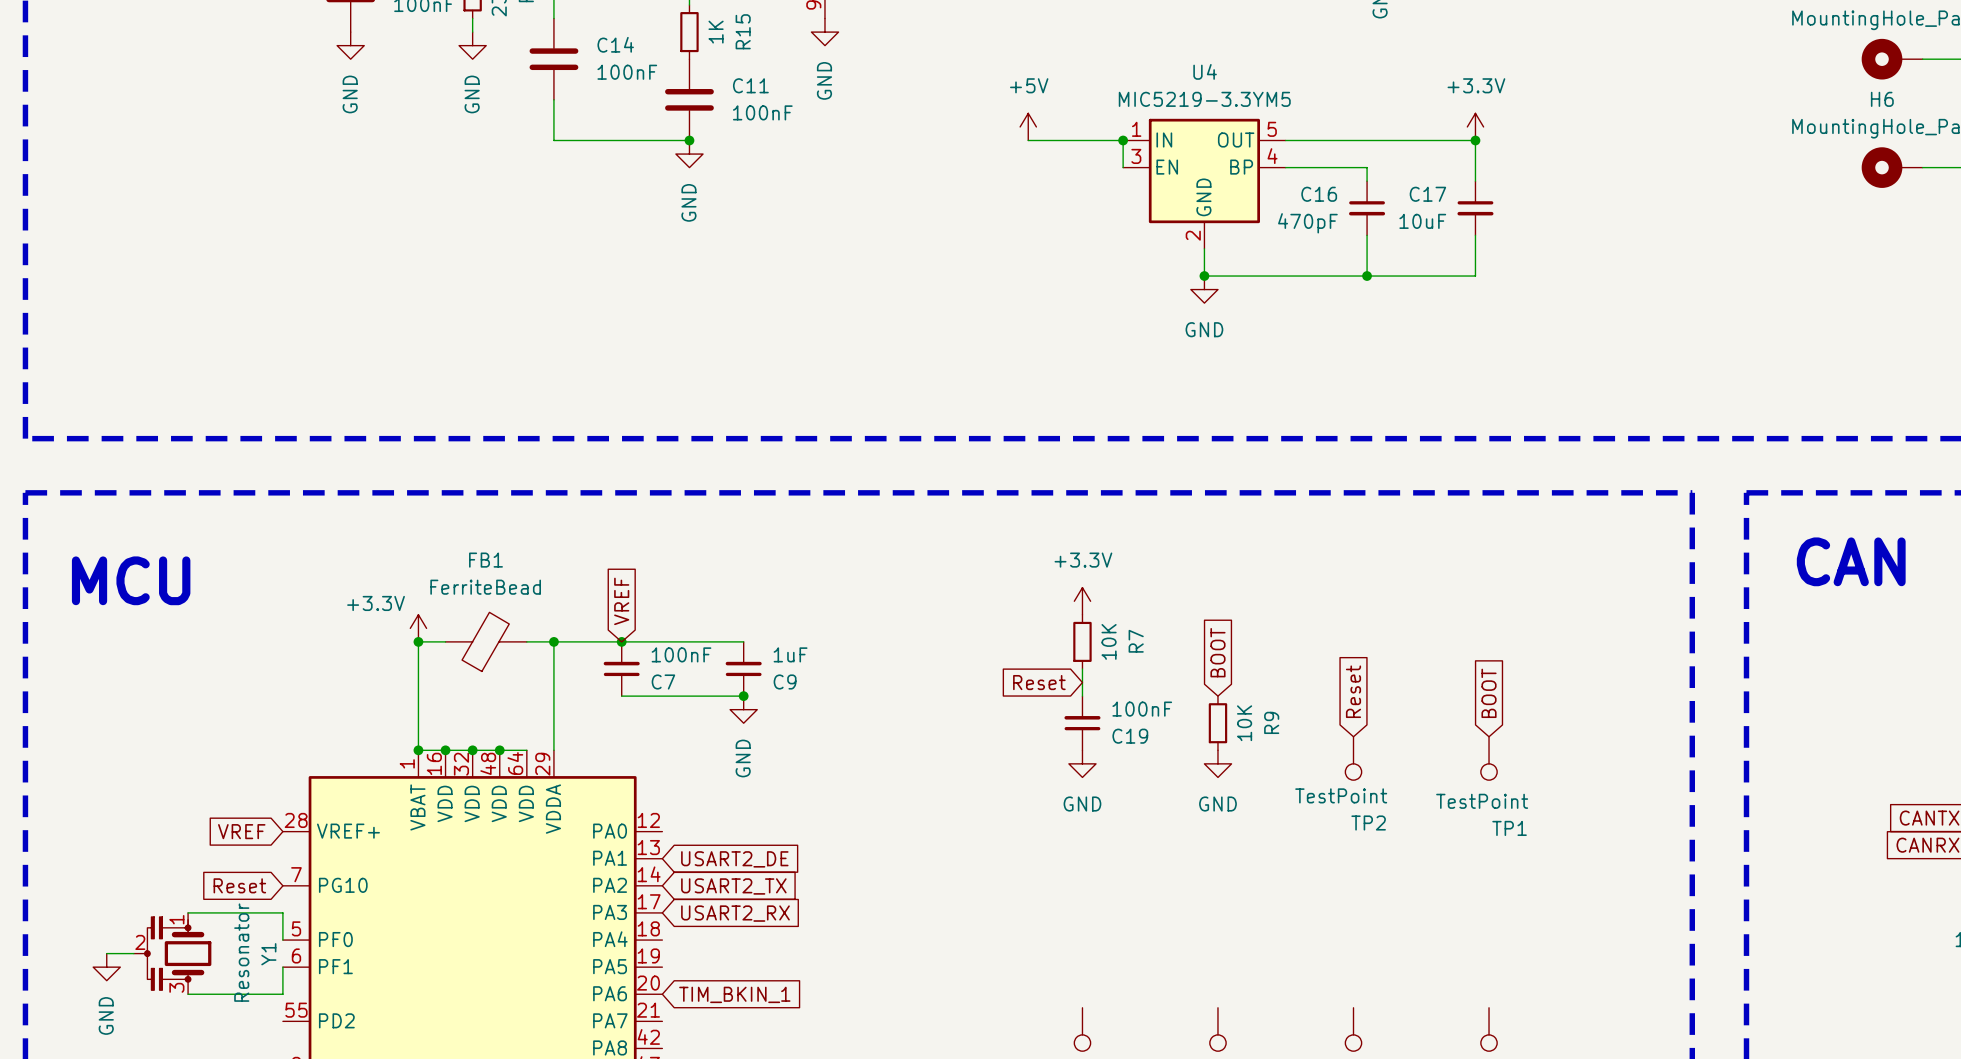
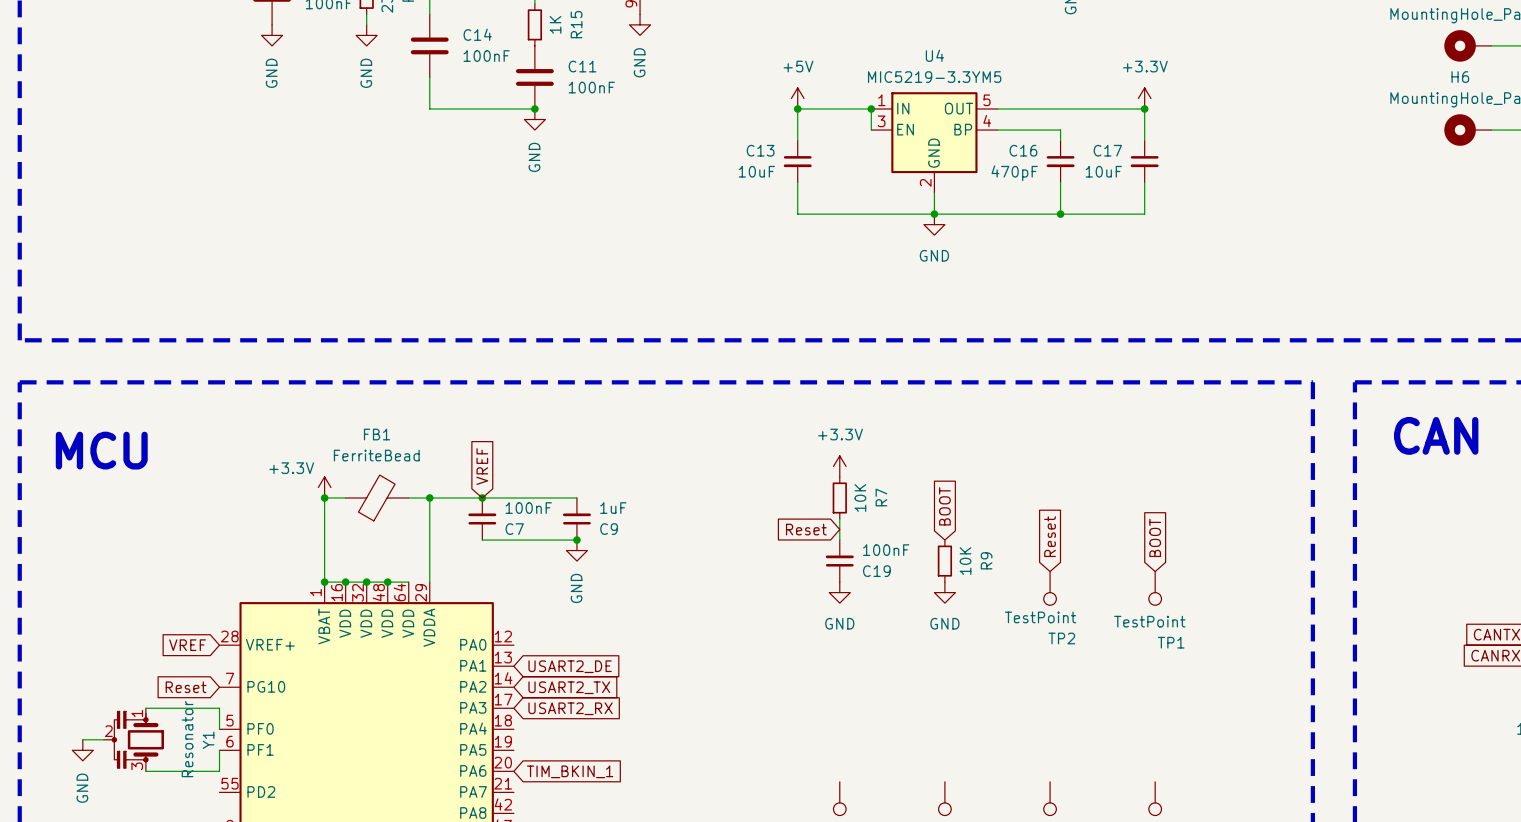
wire: none -> (797, 109) (797, 140)
junction: none -> (797, 109)
C13: none -> 10uF (797, 161)
wire: none -> (797, 182) (797, 214) (934, 214)

